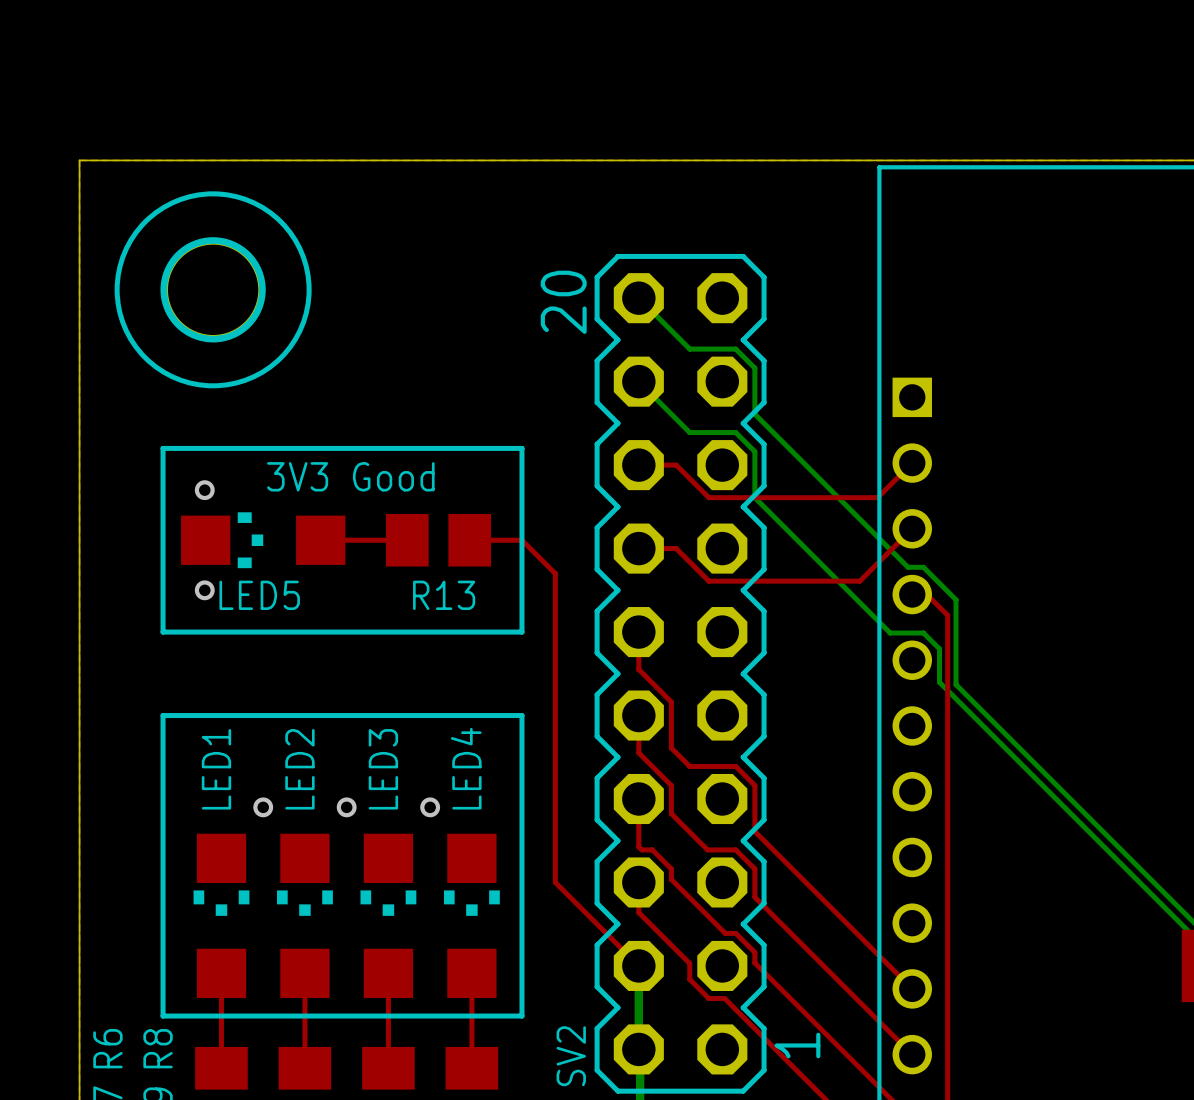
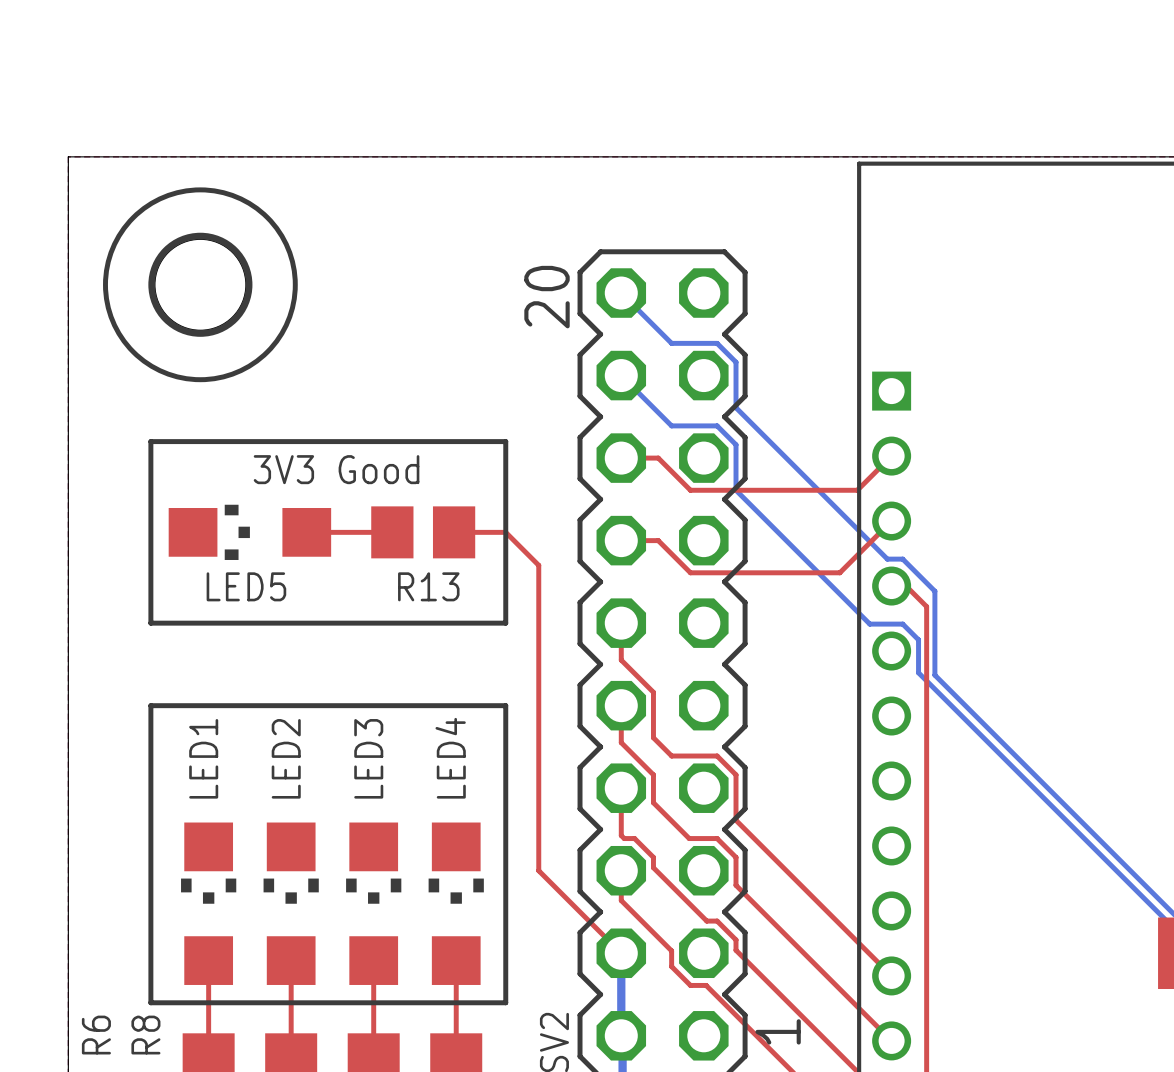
via: (204, 490) -> none
via: (204, 590) -> none
via: (263, 807) -> none
via: (346, 807) -> none
via: (430, 807) -> none

